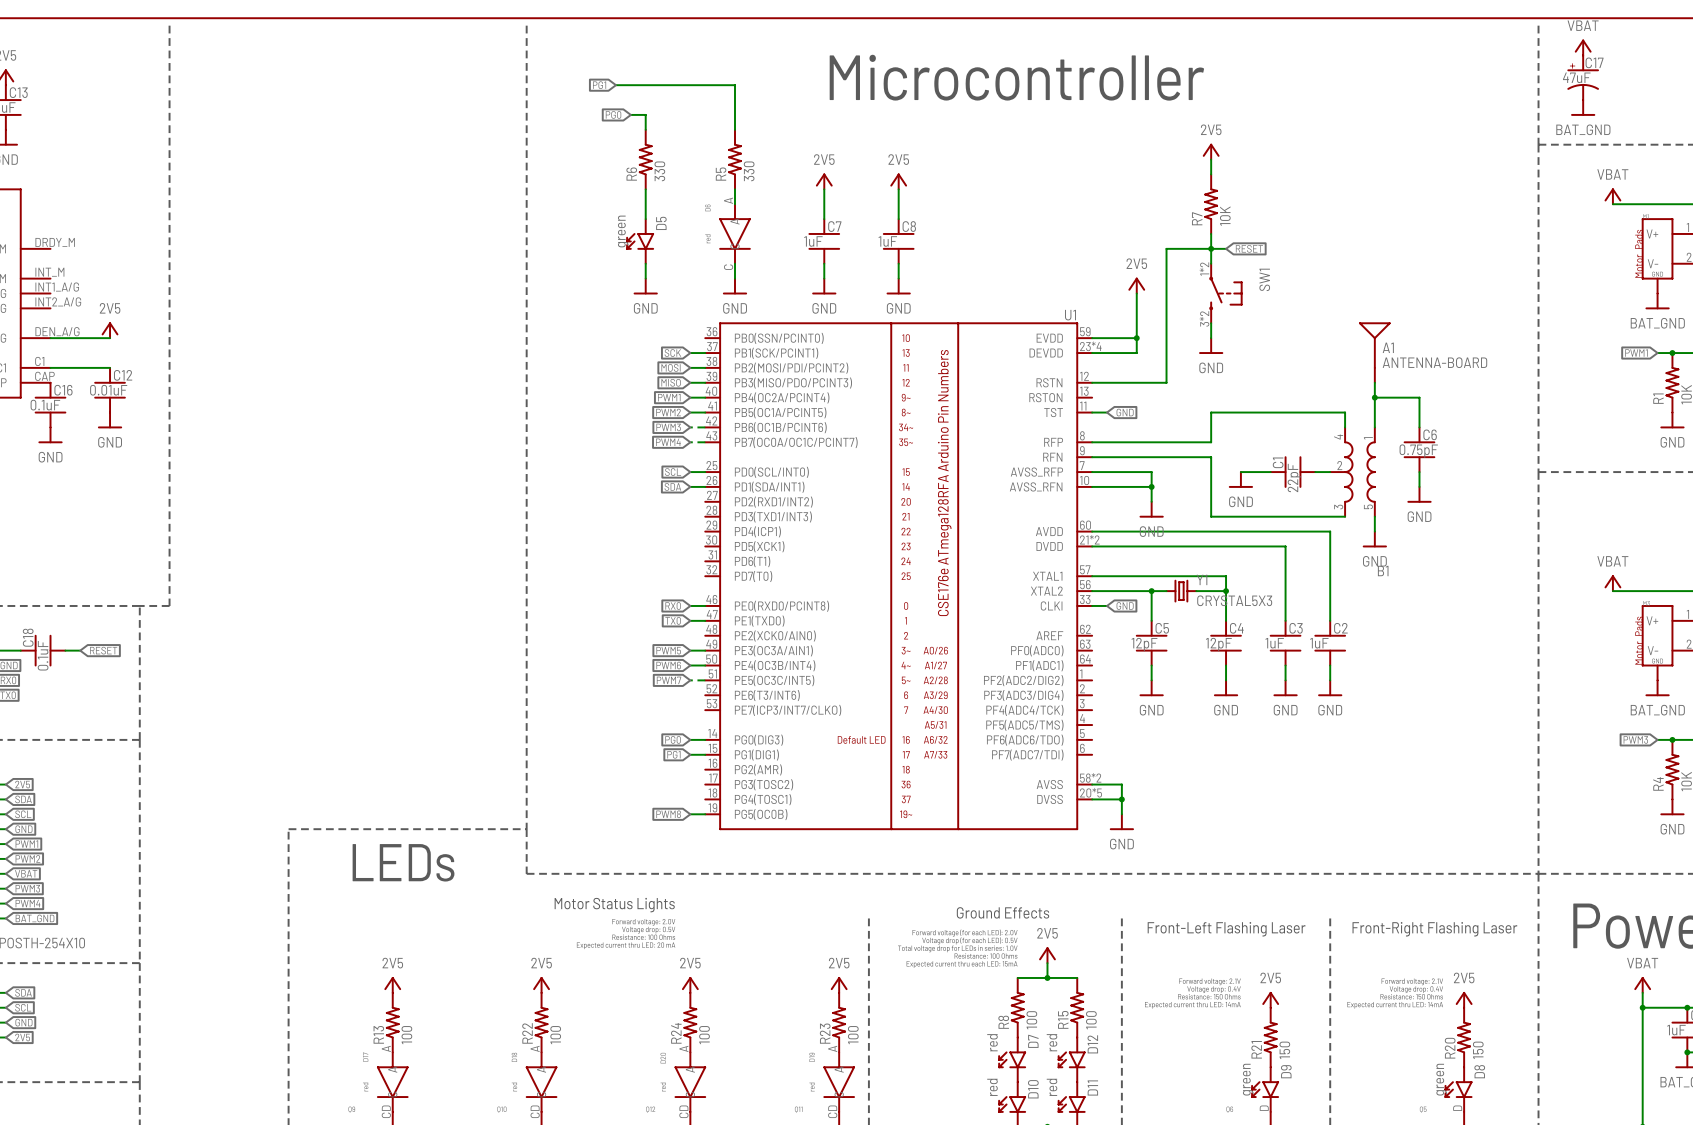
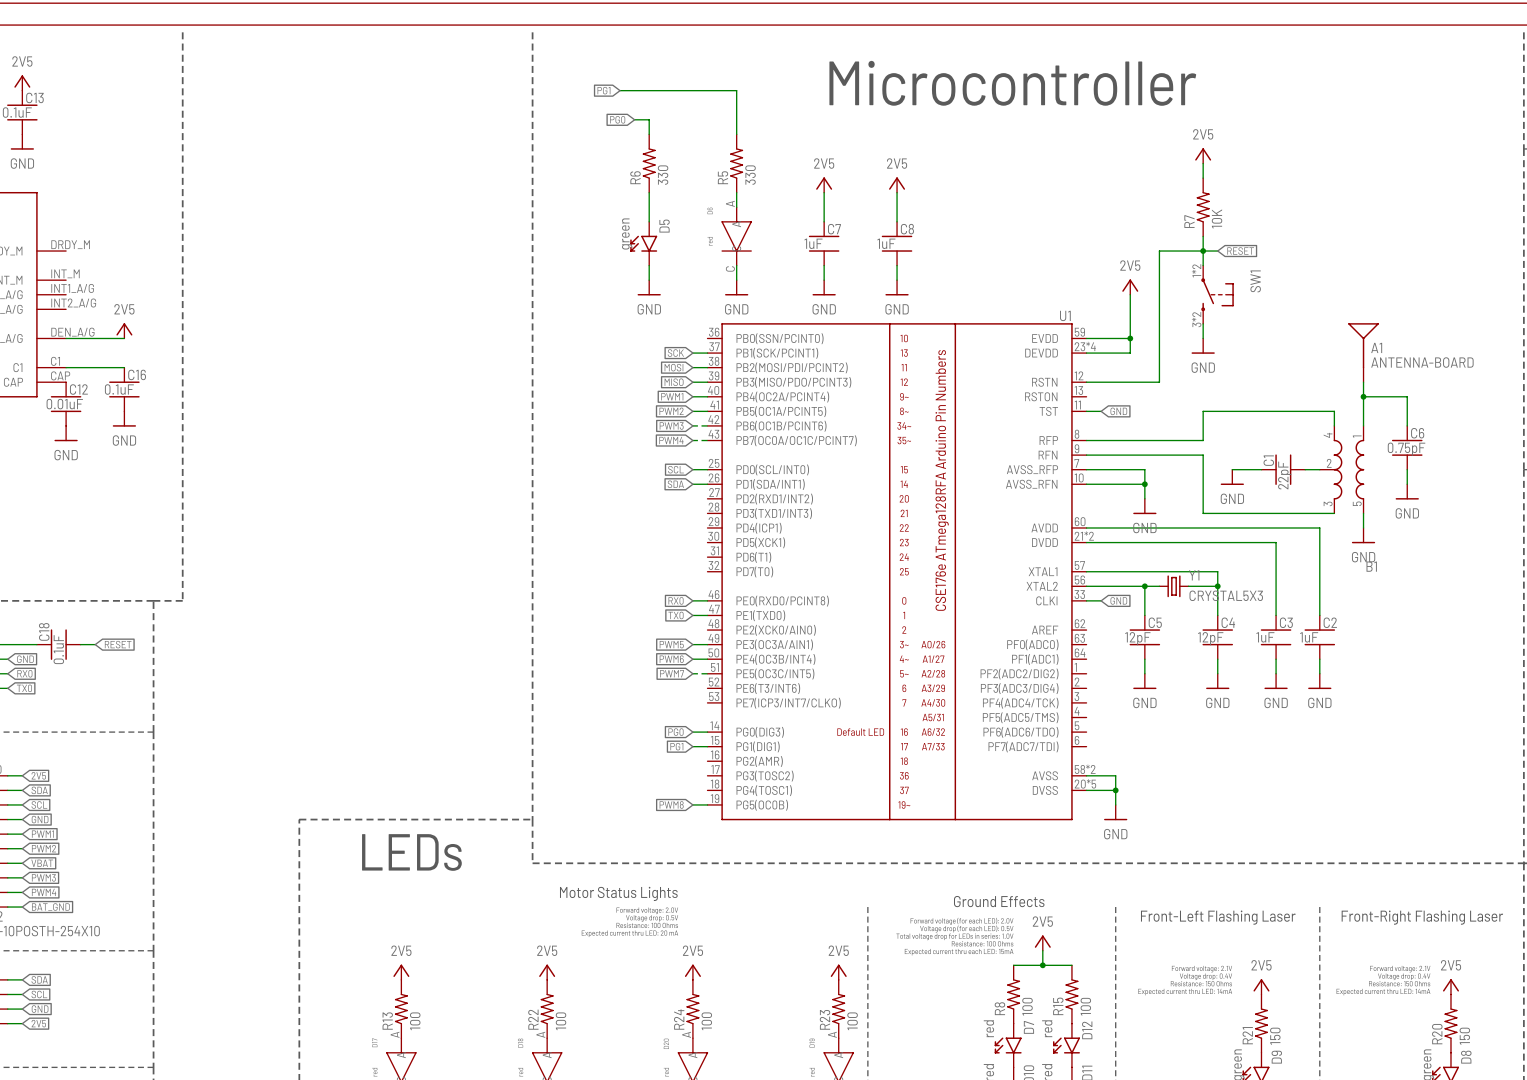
C12 name: C12 (123, 375) -> C16 (137, 374)
C16 name: C16 (63, 390) -> C12 (78, 389)
C12 value: 0.01uF (108, 390) -> 0.1uF (119, 389)
C16 value: 0.1uF (45, 405) -> 0.01uF (64, 404)

